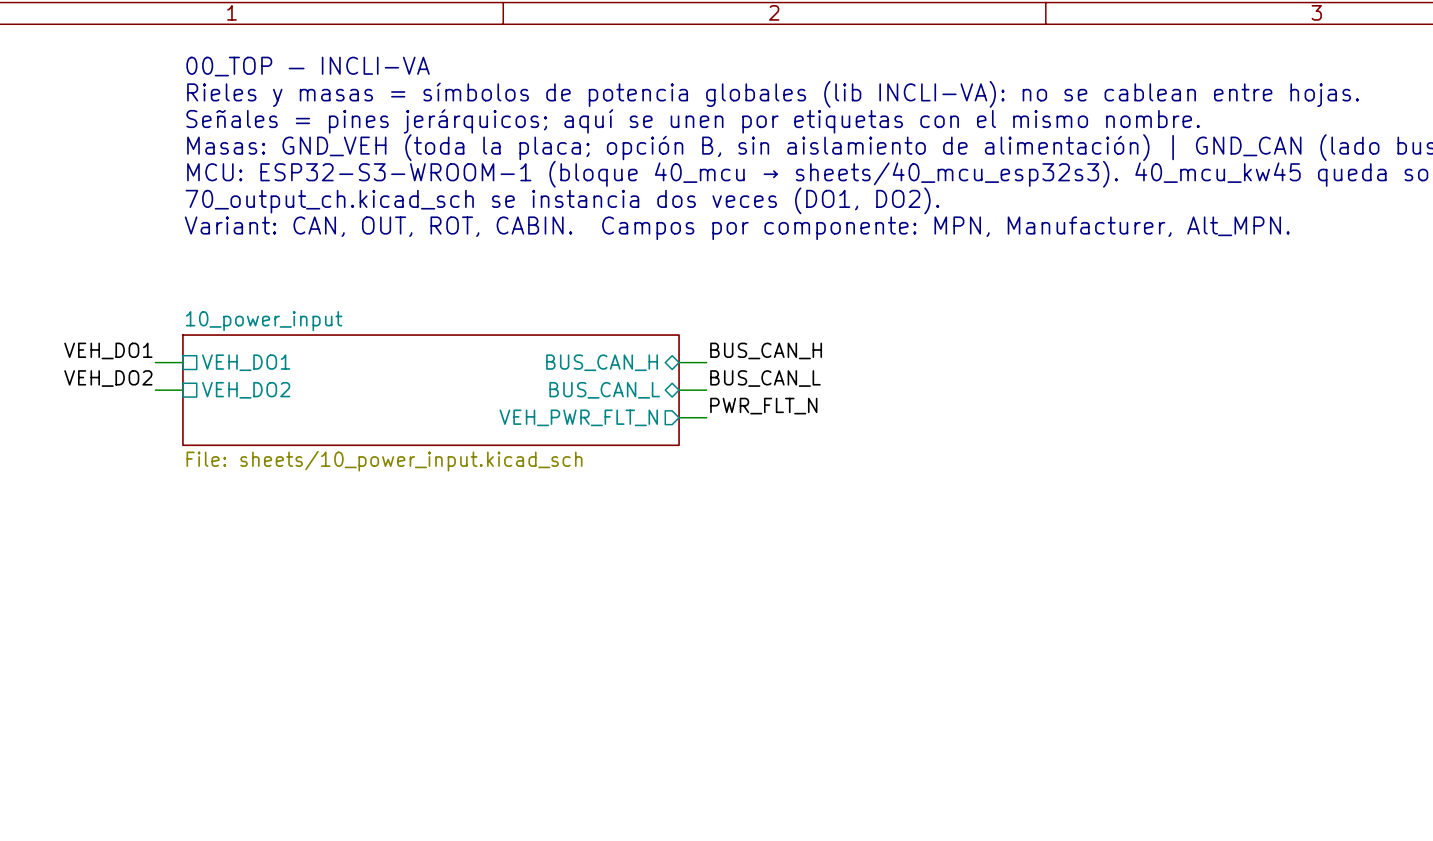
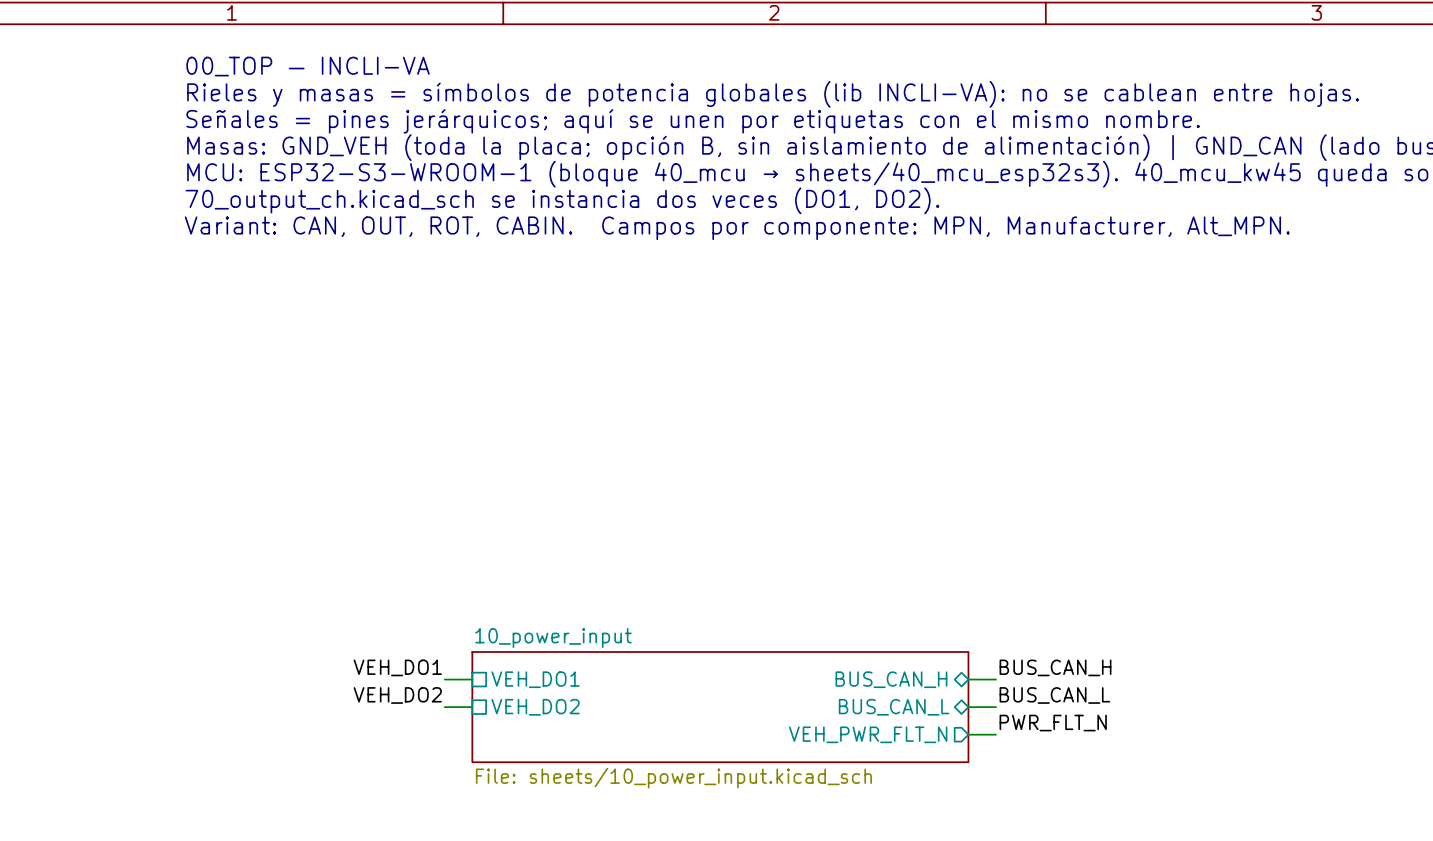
label: VEH_DO1 (108, 350) -> none
label: BUS_CAN_H (766, 350) -> none
wire: (155, 362) (182, 362) -> none
sheet pin: VEH_DO1 (246, 362) -> none
sheet pin: BUS_CAN_H (602, 362) -> none
wire: (679, 362) (706, 362) -> none
label: VEH_DO2 (108, 378) -> none
label: BUS_CAN_L (765, 378) -> none
wire: (155, 390) (182, 390) -> none
sheet pin: VEH_DO2 (246, 390) -> none
sheet 10_power_input position: (430, 390) -> (720, 707)
sheet pin: BUS_CAN_L (604, 390) -> none
wire: (679, 390) (706, 390) -> none
label: PWR_FLT_N (763, 406) -> none
sheet pin: VEH_PWR_FLT_N (578, 417) -> none
wire: (679, 417) (706, 417) -> none
label: none -> VEH_DO1 (397, 667)
label: none -> BUS_CAN_H (1055, 667)
wire: none -> (444, 679) (472, 679)
sheet pin: none -> VEH_DO1 (535, 679)
sheet pin: none -> BUS_CAN_H (891, 679)
wire: none -> (968, 679) (996, 679)
label: none -> VEH_DO2 (397, 695)
label: none -> BUS_CAN_L (1054, 695)
wire: none -> (444, 707) (472, 707)
sheet pin: none -> VEH_DO2 (535, 707)
sheet pin: none -> BUS_CAN_L (894, 707)
wire: none -> (968, 707) (996, 707)
label: none -> PWR_FLT_N (1053, 723)
sheet pin: none -> VEH_PWR_FLT_N (868, 734)
wire: none -> (968, 734) (996, 734)

